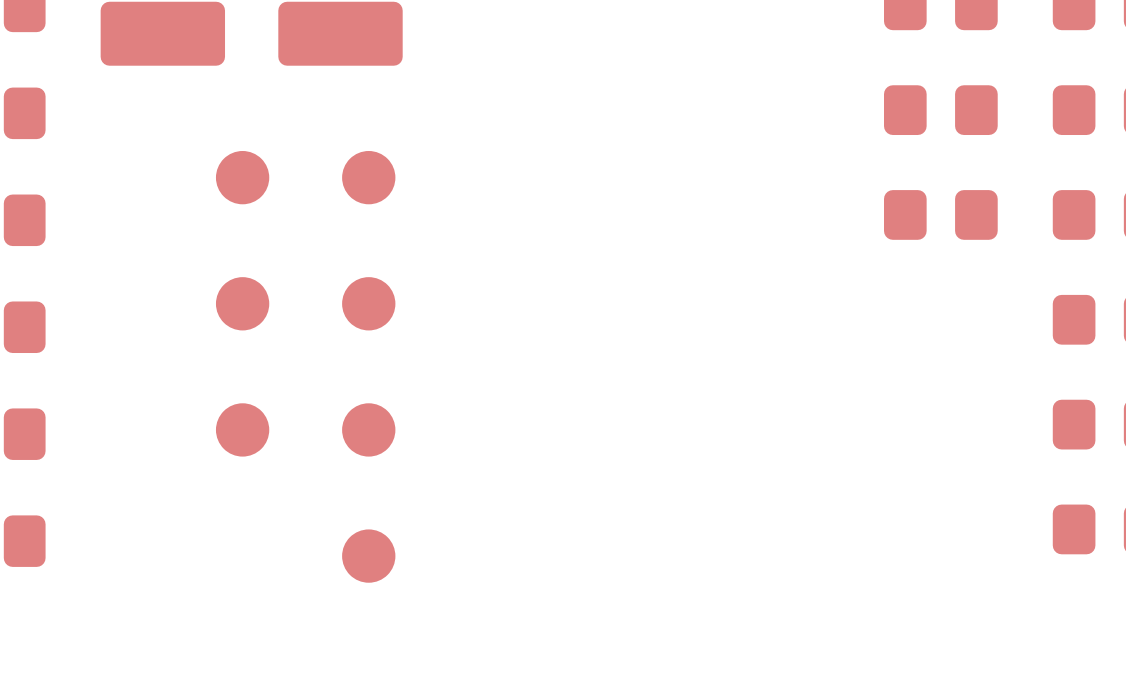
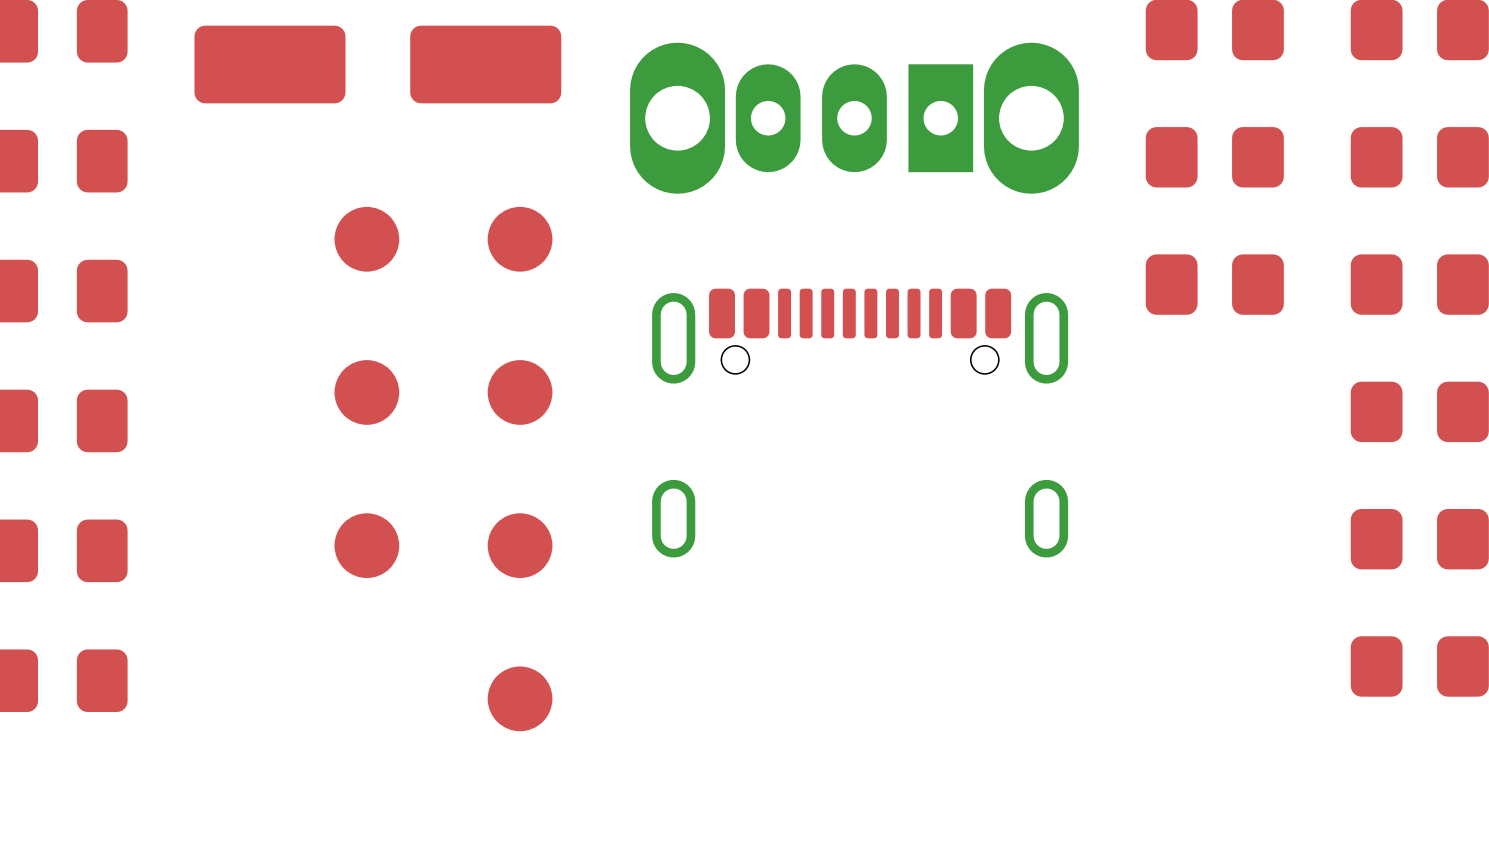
part: none -> (854, 118)
part: none -> (860, 423)

